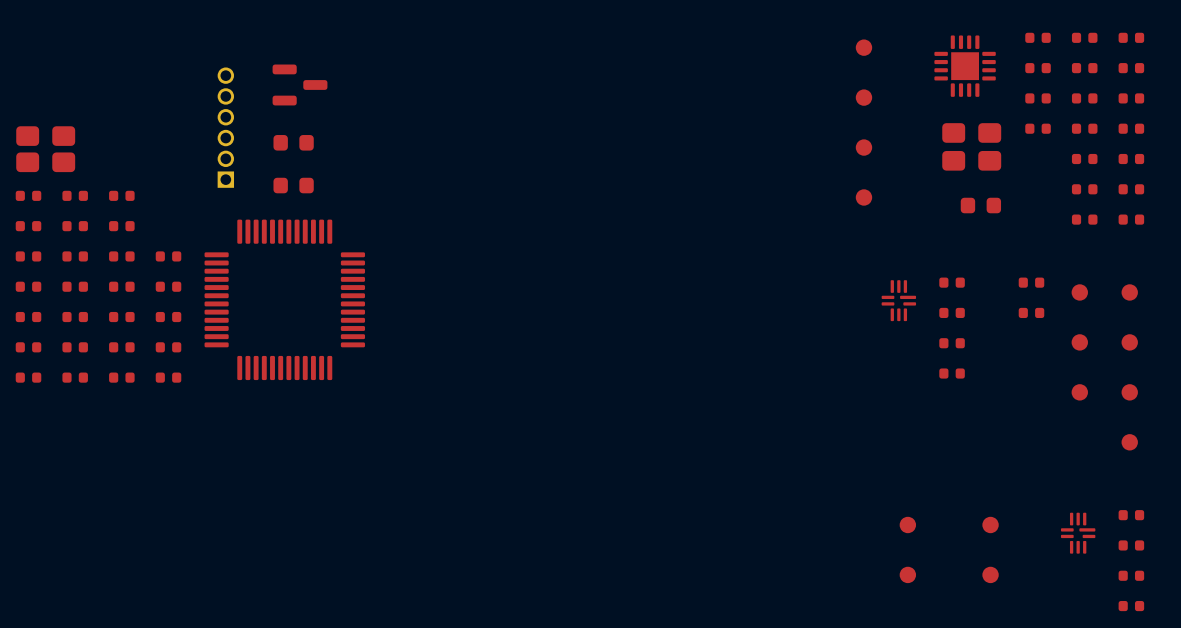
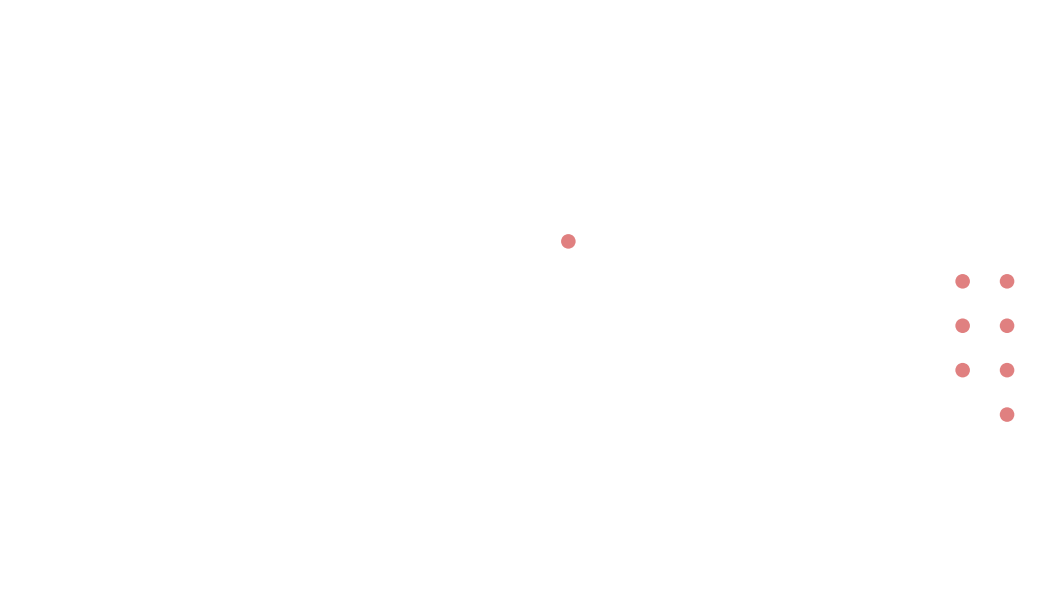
part: (1038, 37) -> none
part: (1084, 37) -> none
part: (1131, 37) -> none
part: (863, 47) -> none
part: (965, 66) -> none
part: (1038, 68) -> none
part: (1084, 68) -> none
part: (1131, 68) -> none
part: (300, 84) -> none
part: (863, 97) -> none
part: (1038, 98) -> none
part: (1084, 98) -> none
part: (1131, 98) -> none
part: (225, 127) -> none
part: (1038, 128) -> none
part: (1084, 128) -> none
part: (1131, 128) -> none
part: (293, 142) -> none
part: (971, 146) -> none
part: (863, 147) -> none
part: (45, 149) -> none
part: (1084, 159) -> none
part: (1131, 159) -> none
part: (293, 185) -> none
part: (1084, 189) -> none
part: (1131, 189) -> none
part: (28, 195) -> none
part: (75, 195) -> none
part: (121, 195) -> none
part: (863, 197) -> none
part: (980, 205) -> none
part: (1084, 219) -> none
part: (1131, 219) -> none
part: (28, 226) -> none
part: (75, 226) -> none
part: (121, 226) -> none
part: none -> (568, 241)
part: (28, 256) -> none
part: (75, 256) -> none
part: (121, 256) -> none
part: (168, 256) -> none
part: (952, 282) -> none
part: (1031, 282) -> none
part: (28, 286) -> none
part: (75, 286) -> none
part: (121, 286) -> none
part: (168, 286) -> none
part: (284, 299) -> none
part: (898, 300) -> none
part: (952, 312) -> none
part: (1031, 312) -> none
part: (28, 317) -> none
part: (75, 317) -> none
part: (121, 317) -> none
part: (168, 317) -> none
part: (952, 343) -> none
part: (28, 347) -> none
part: (75, 347) -> none
part: (121, 347) -> none
part: (168, 347) -> none
part: (952, 373) -> none
part: (28, 377) -> none
part: (75, 377) -> none
part: (121, 377) -> none
part: (168, 377) -> none
part: (1131, 515) -> none
part: (907, 524) -> none
part: (990, 524) -> none
part: (1078, 533) -> none
part: (1131, 545) -> none
part: (907, 574) -> none
part: (990, 574) -> none
part: (1131, 575) -> none
part: (1131, 606) -> none

